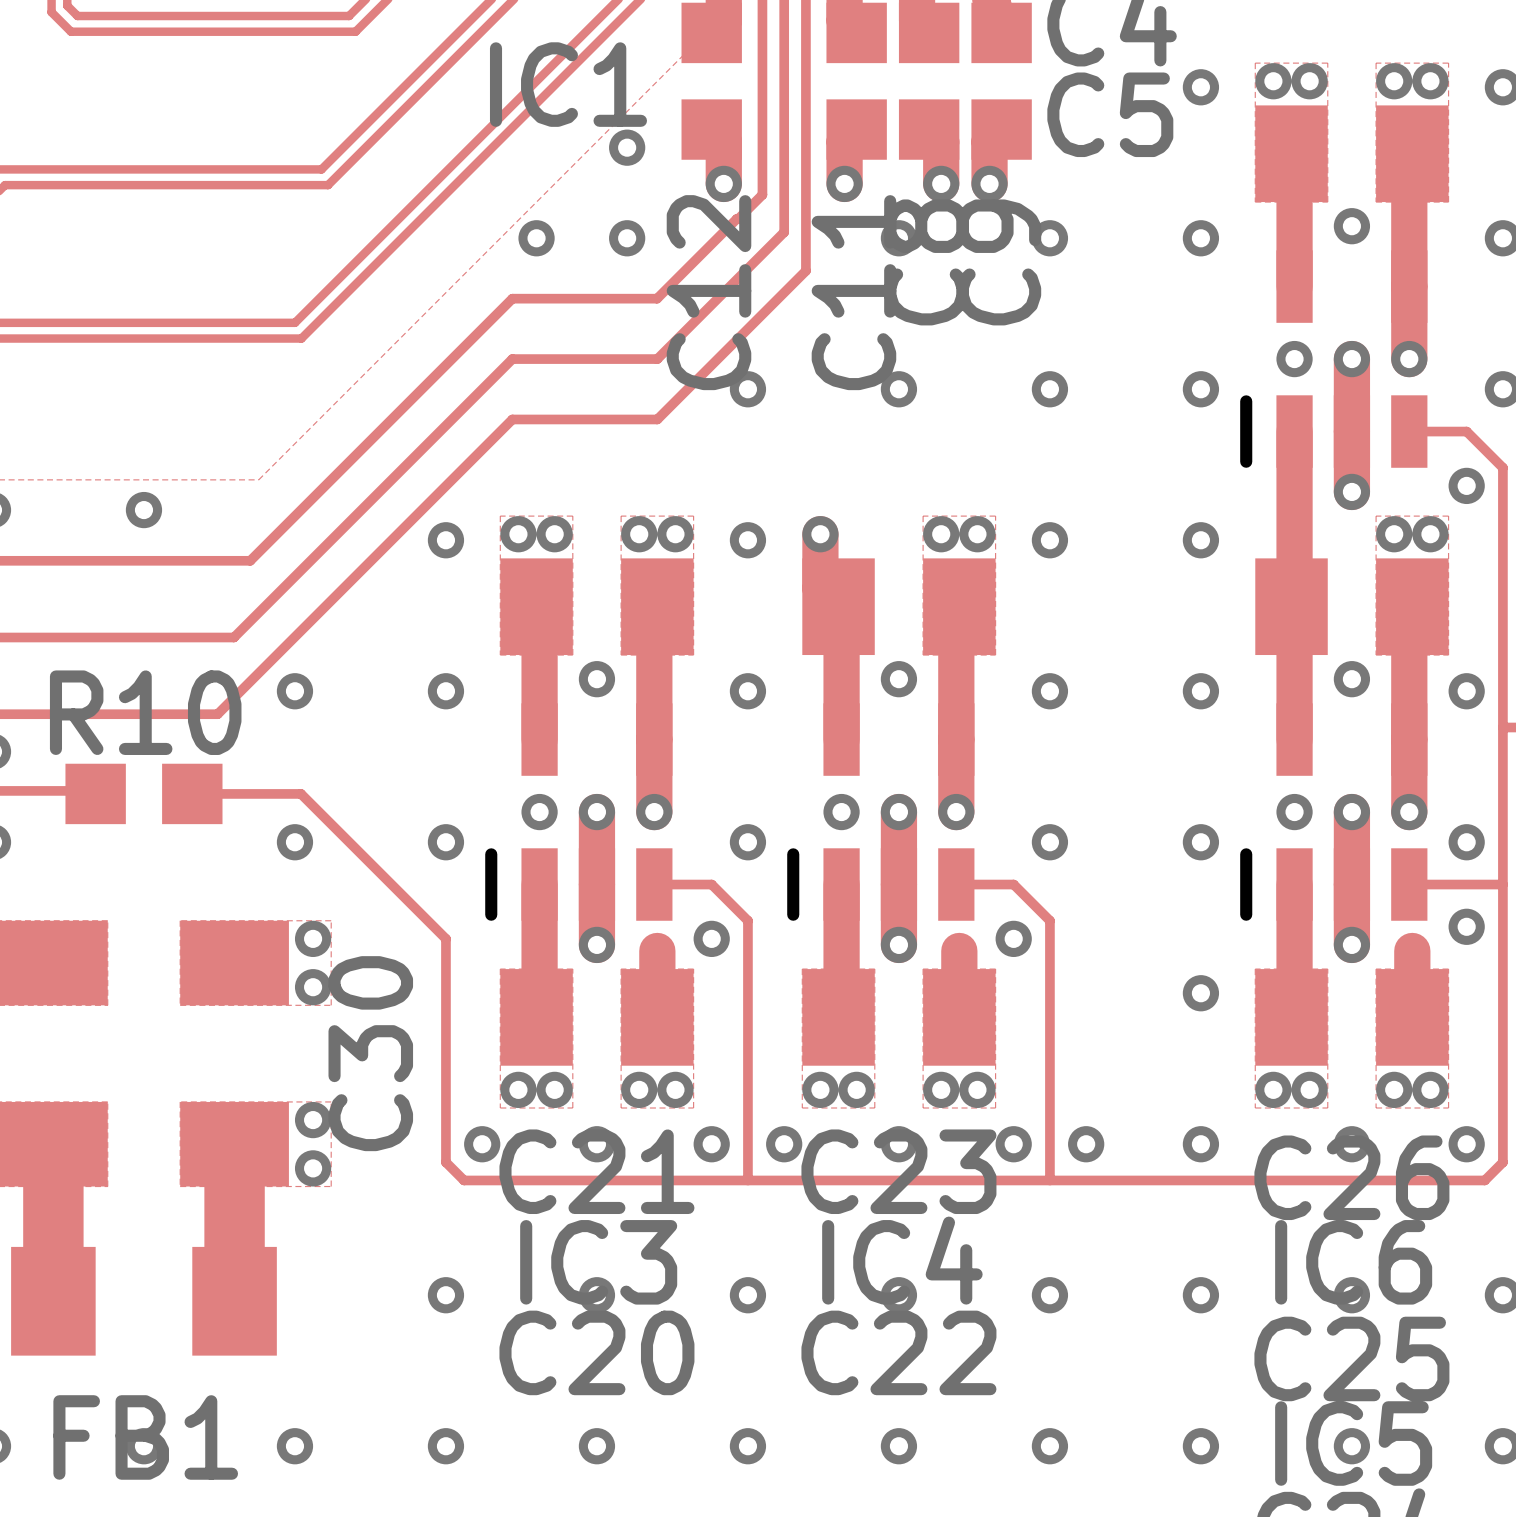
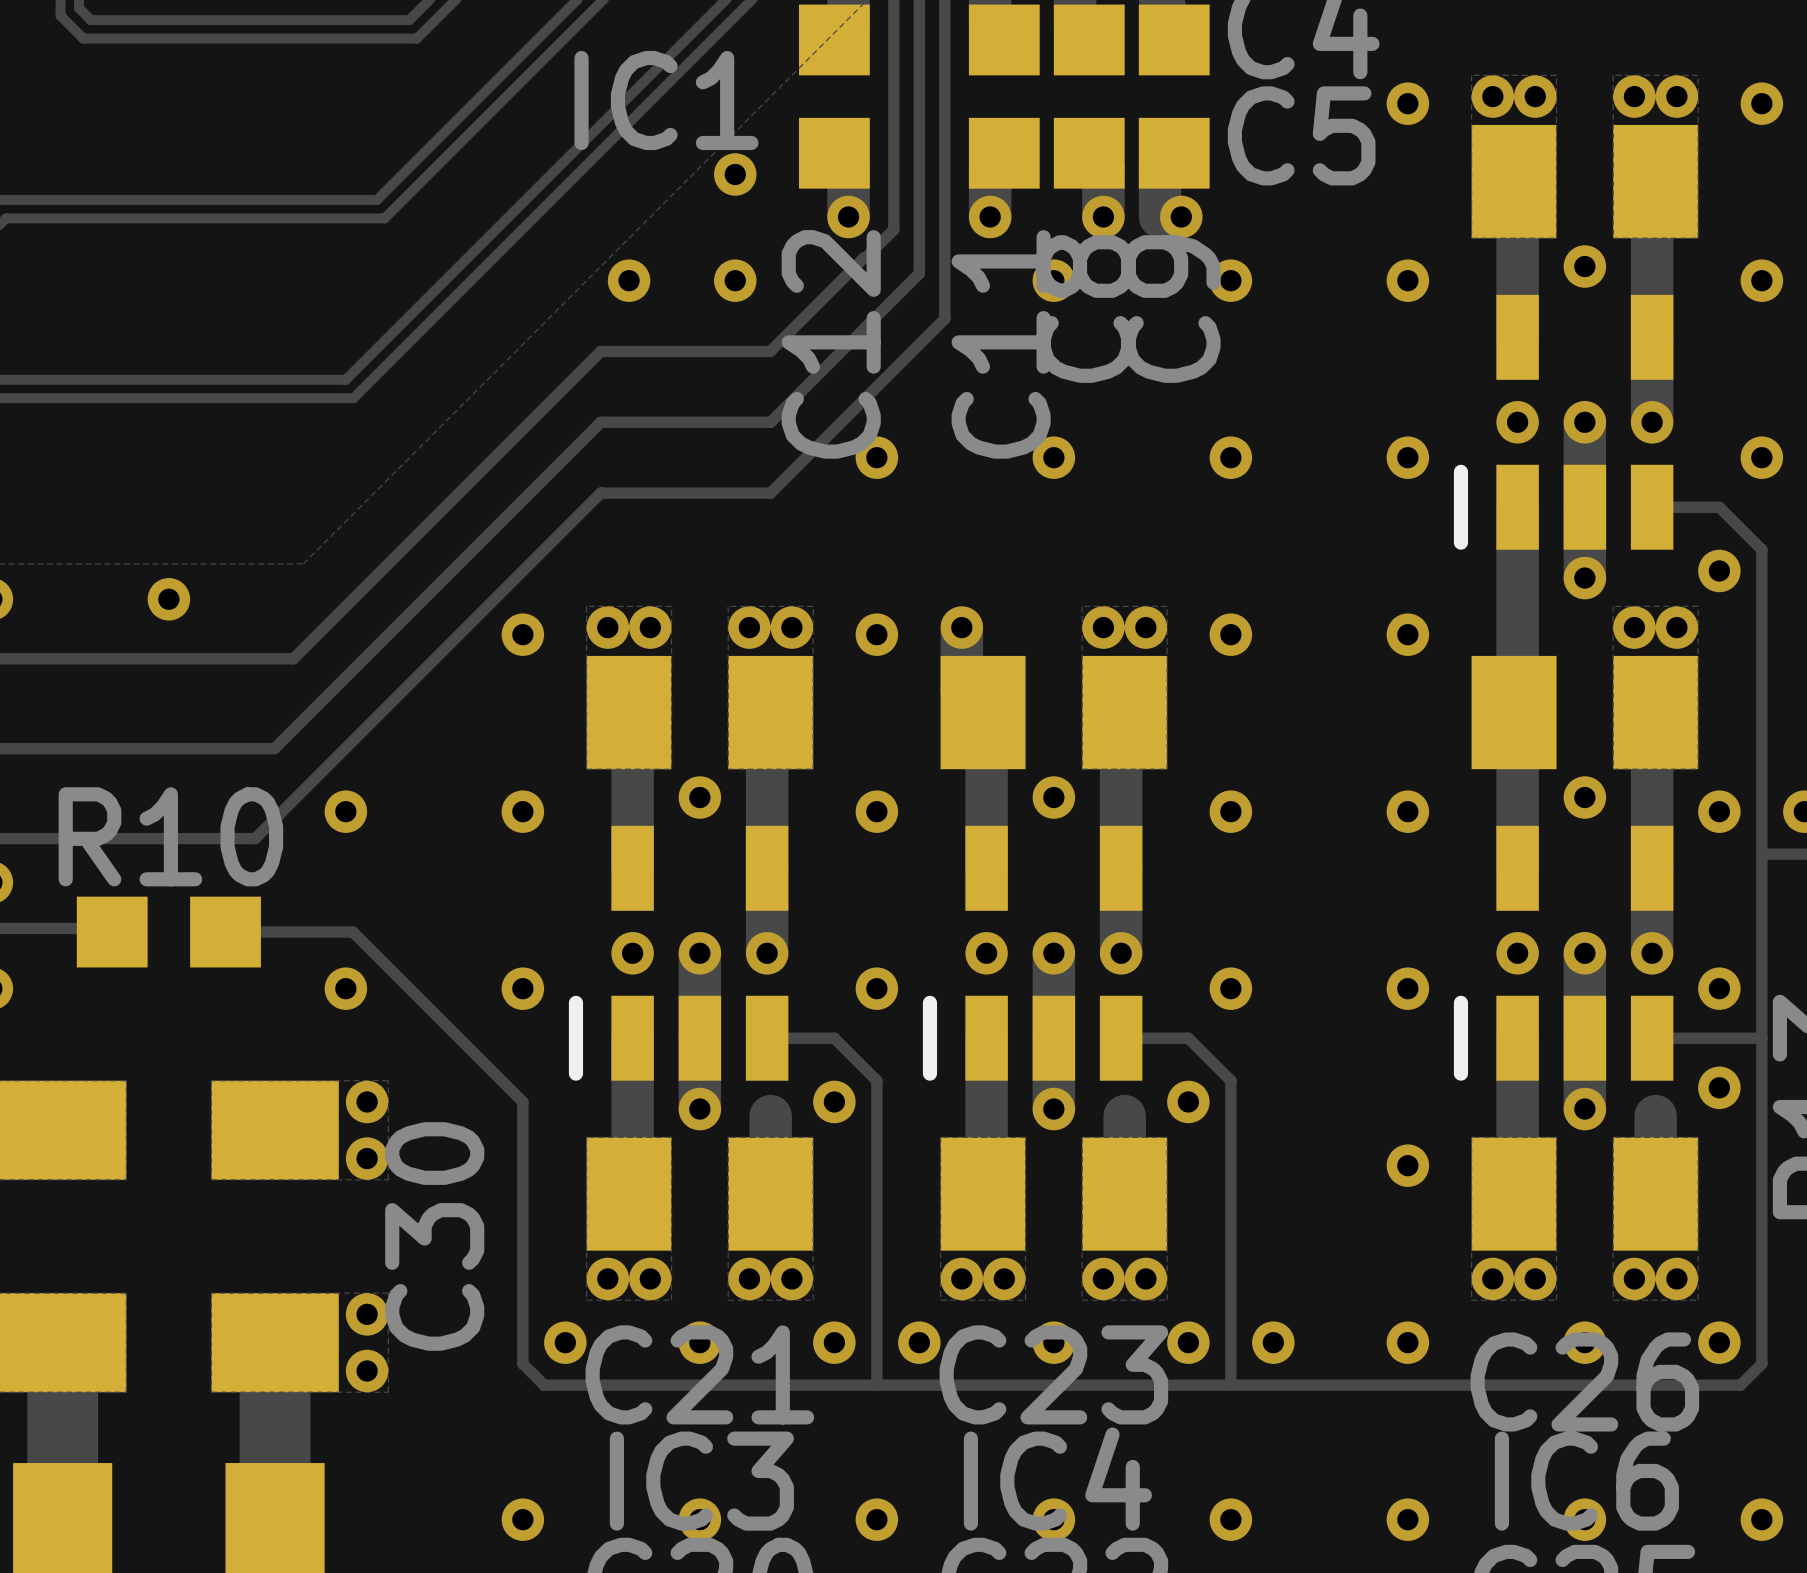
via position: (989, 183) -> (1181, 216)

